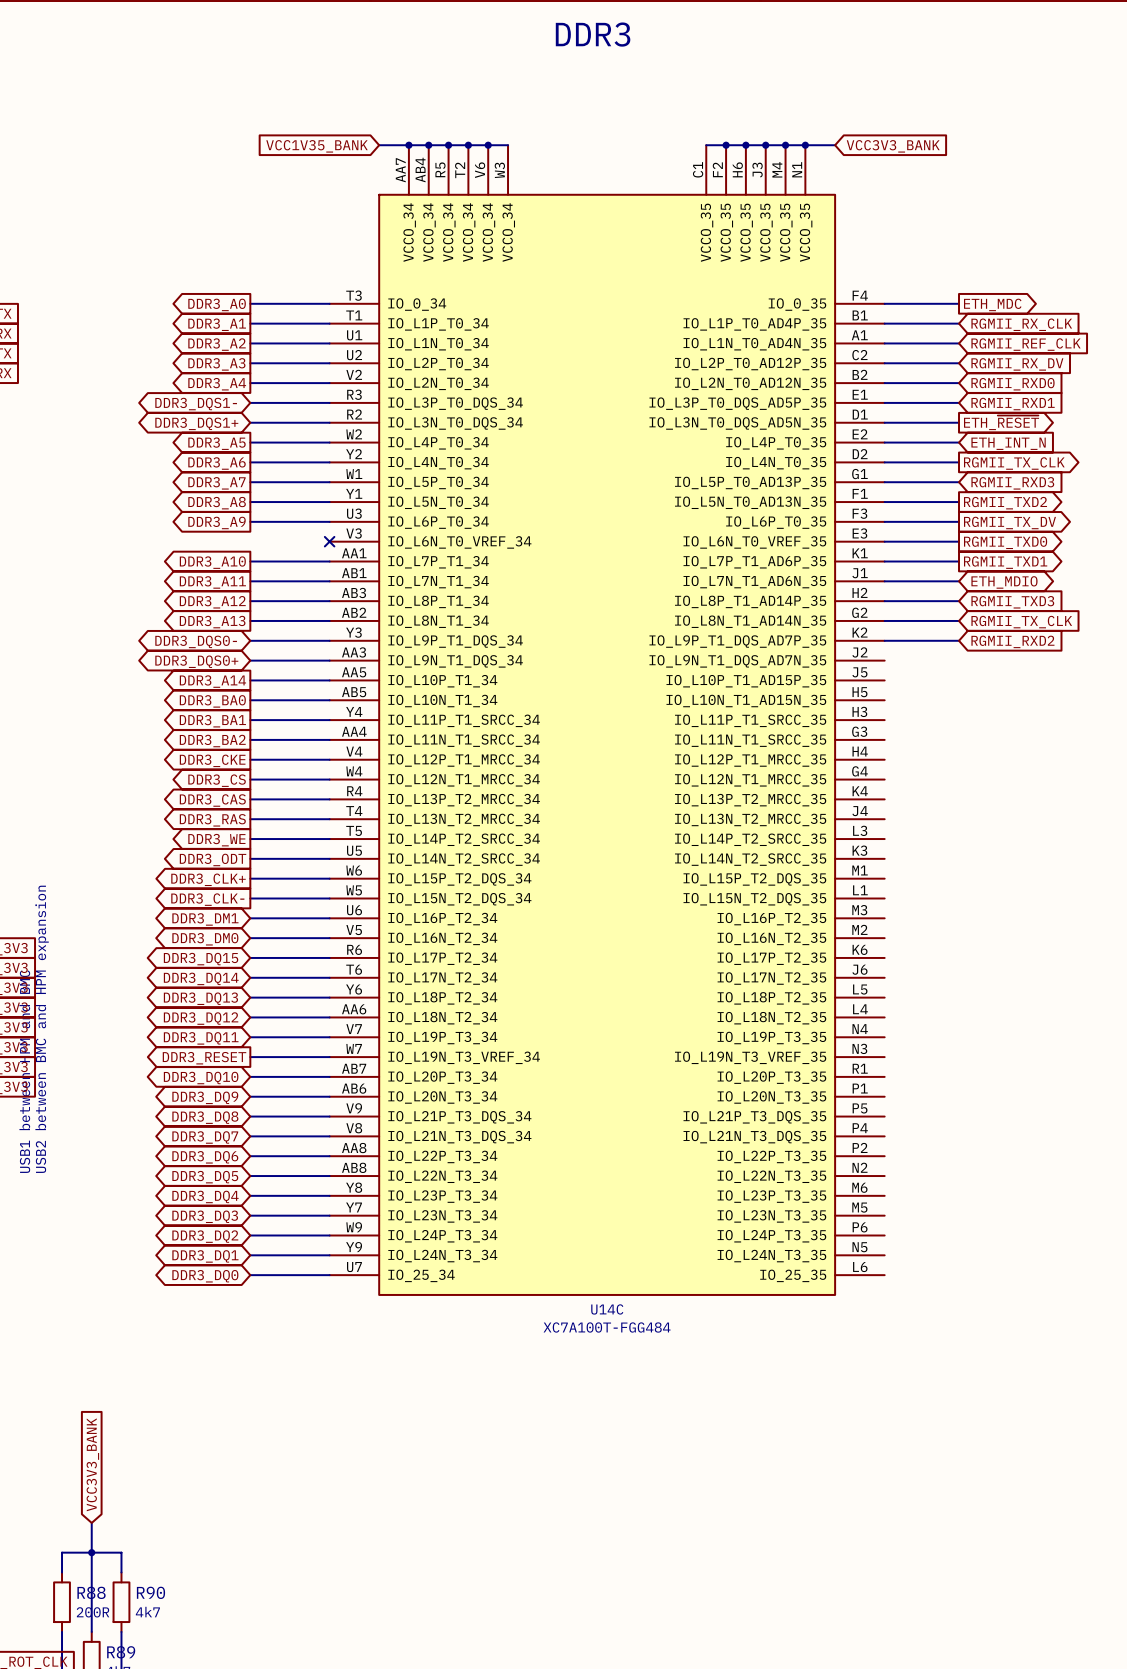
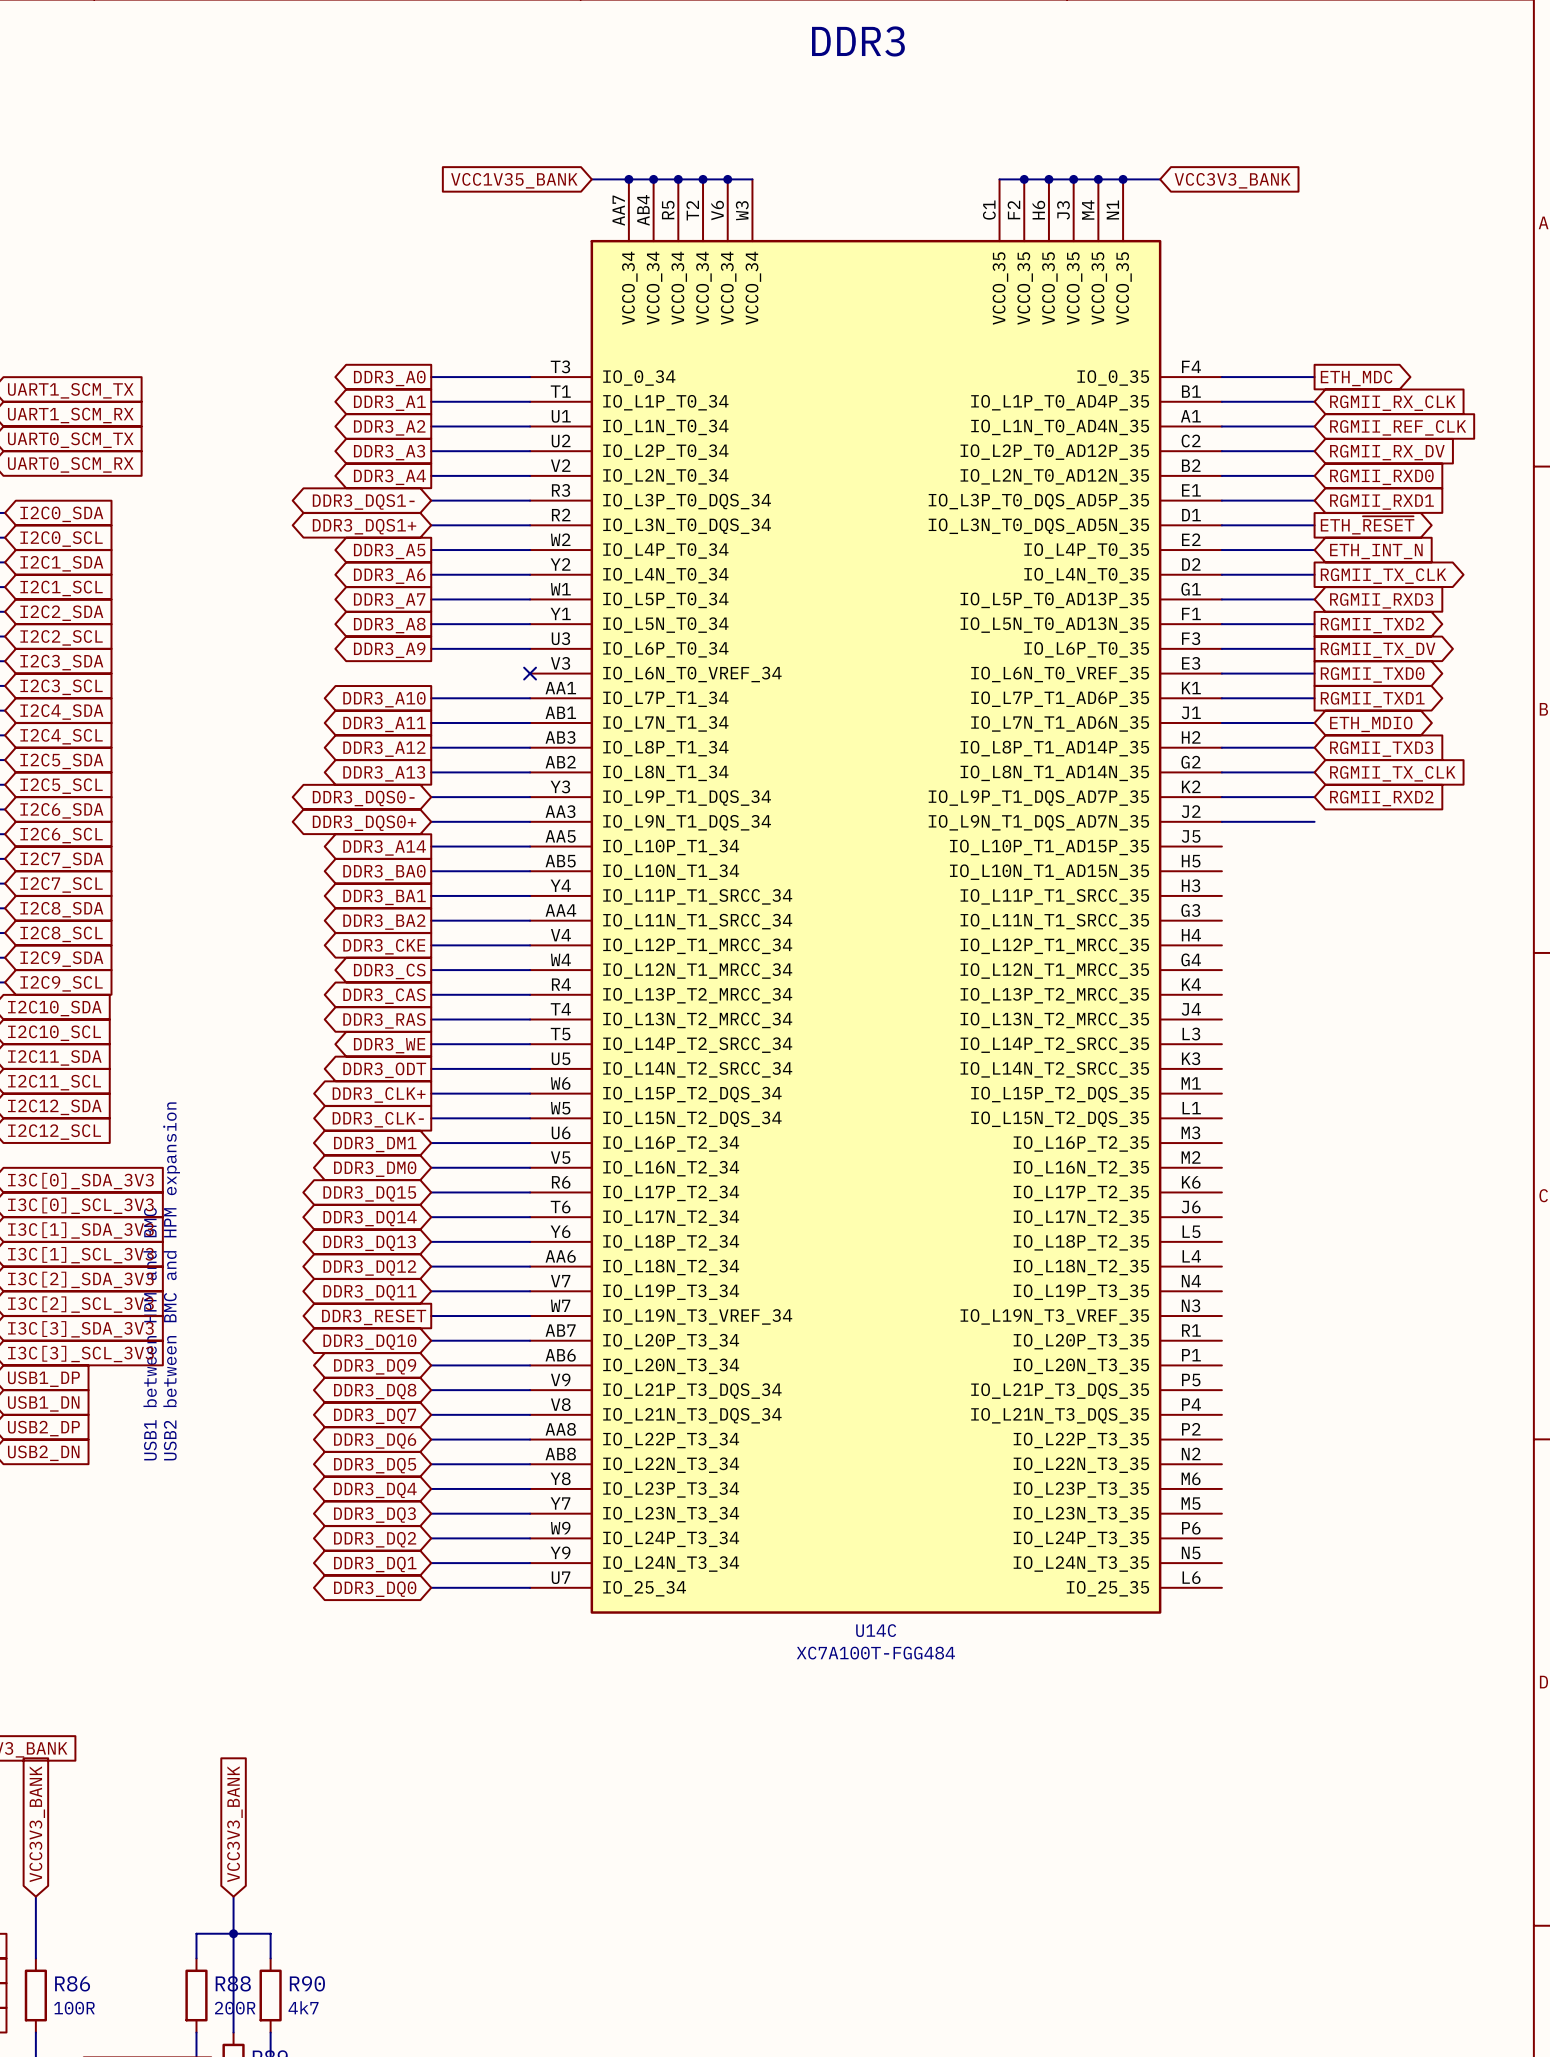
wire: none -> (1221, 821) (1314, 821)

